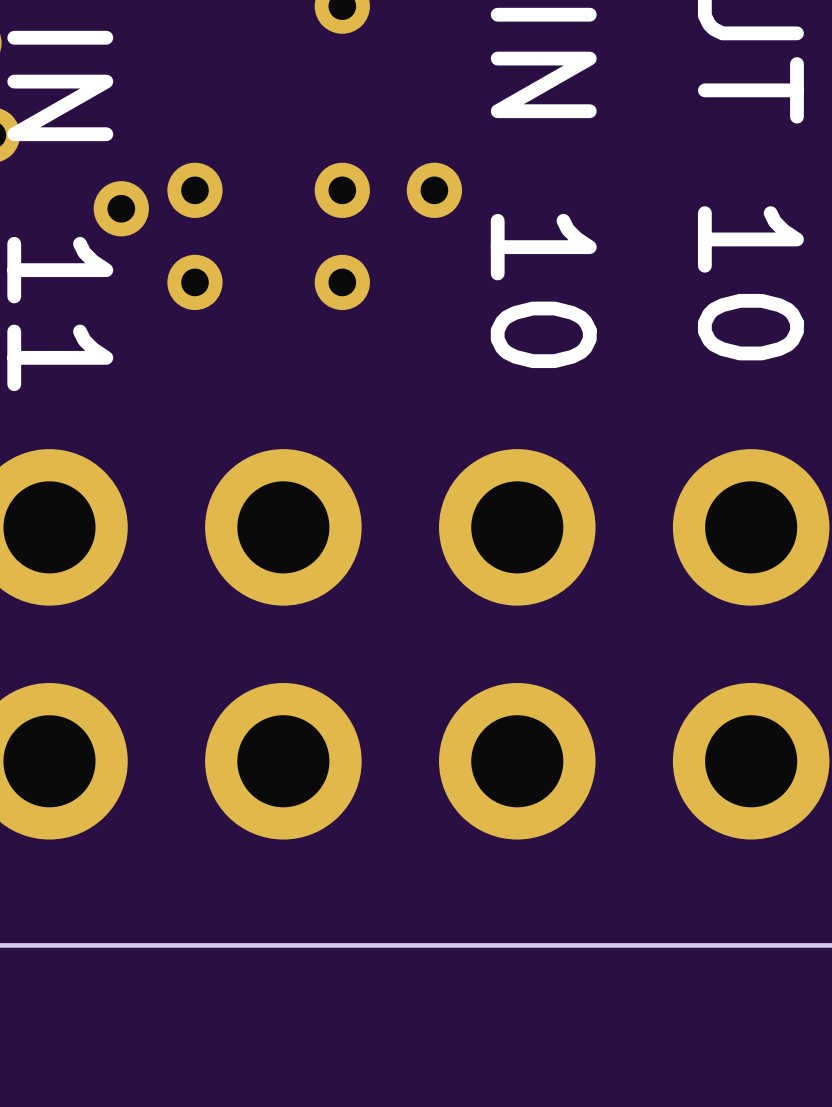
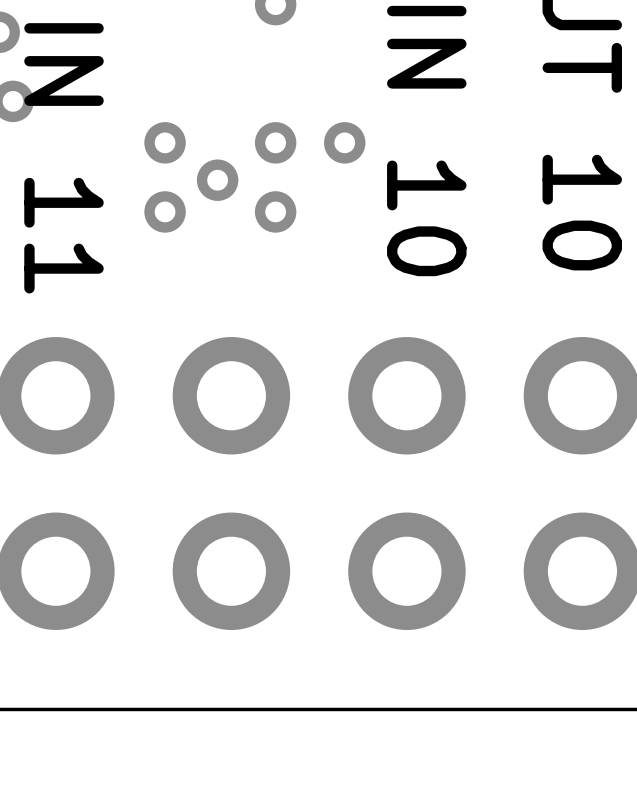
part position: (121, 208) -> (217, 180)

